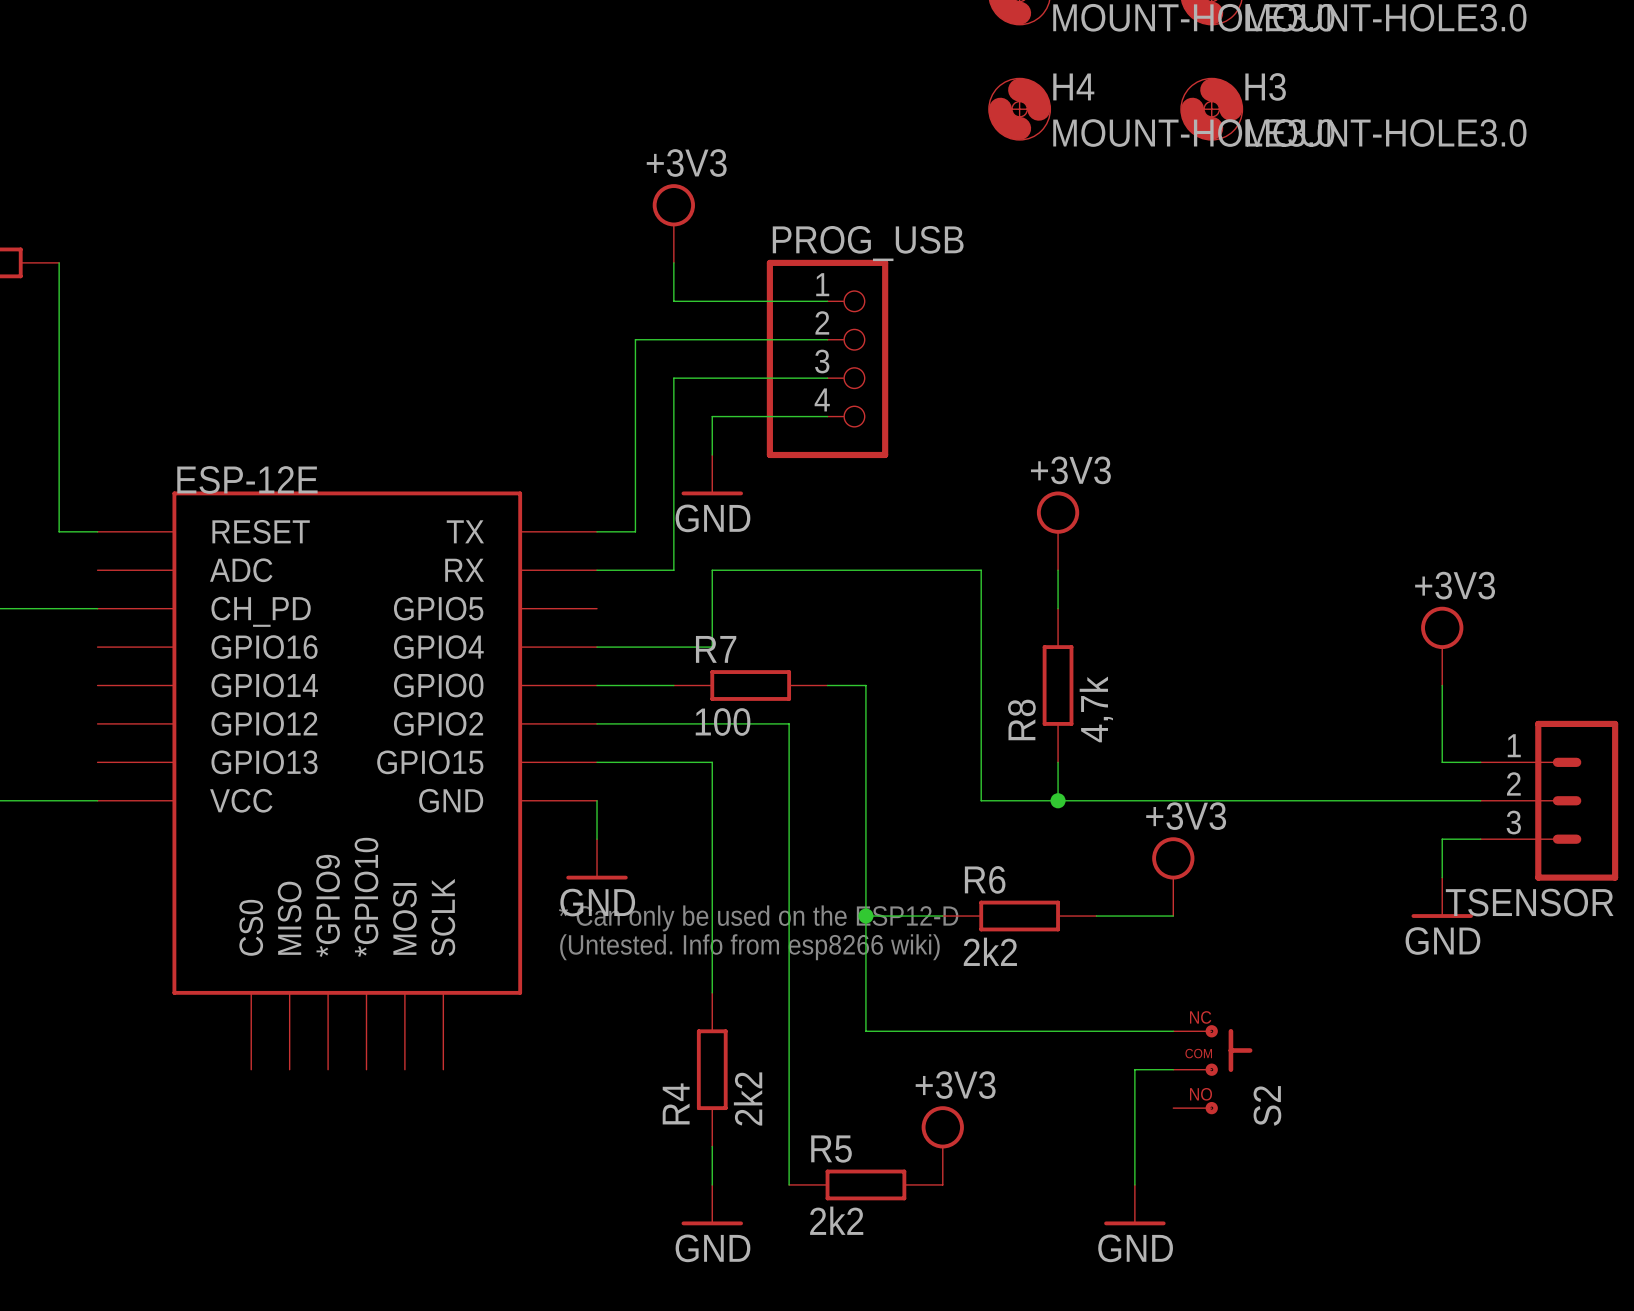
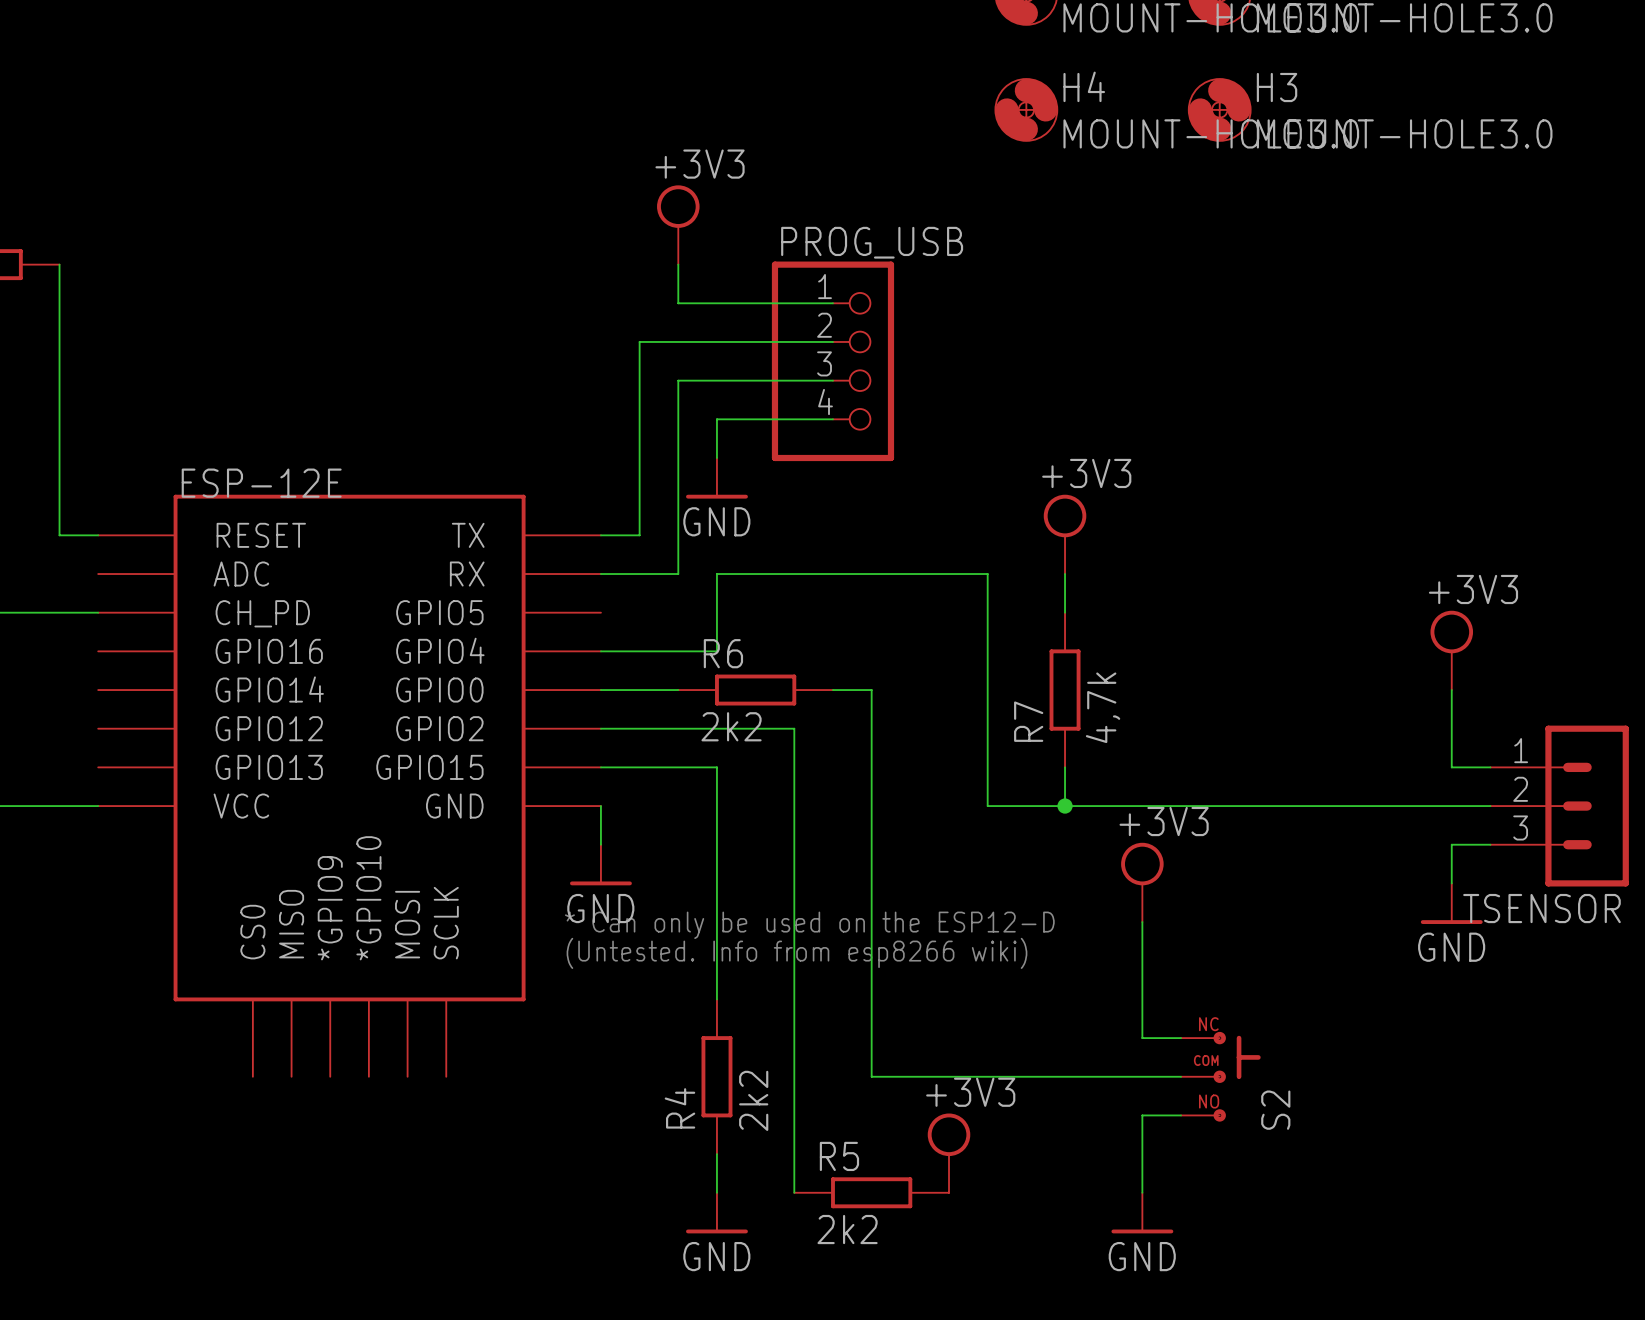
R7 name: R7 (716, 649) -> R6 (723, 653)
R8 name: R8 (1021, 719) -> R7 (1028, 721)
R7 value: 100 (723, 722) -> 2k2 (731, 726)
power symbol position: +3V3 (1173, 876) -> +3V3 (1142, 882)
wire: (865, 916) (942, 916) -> none
junction: (865, 916) -> none
R6: 2k2 (1019, 916) -> none
wire: (1096, 916) (1173, 916) -> none
wire: none -> (1142, 922) (1142, 1038)
wire: (865, 1031) (1134, 1031) -> (871, 1038) (871, 1076) (1142, 1076)
wire: (1134, 1069) (1134, 1108) -> (1181, 1115) (1142, 1115)

